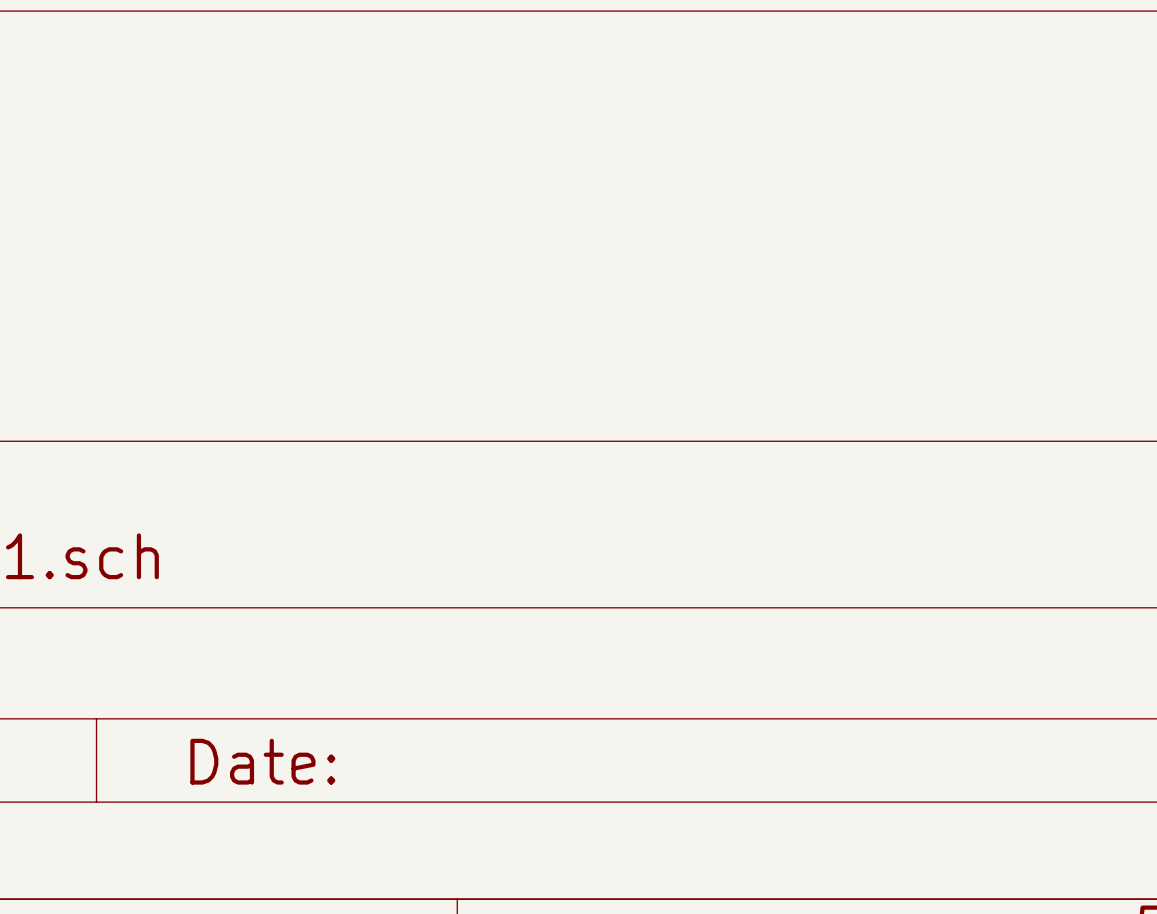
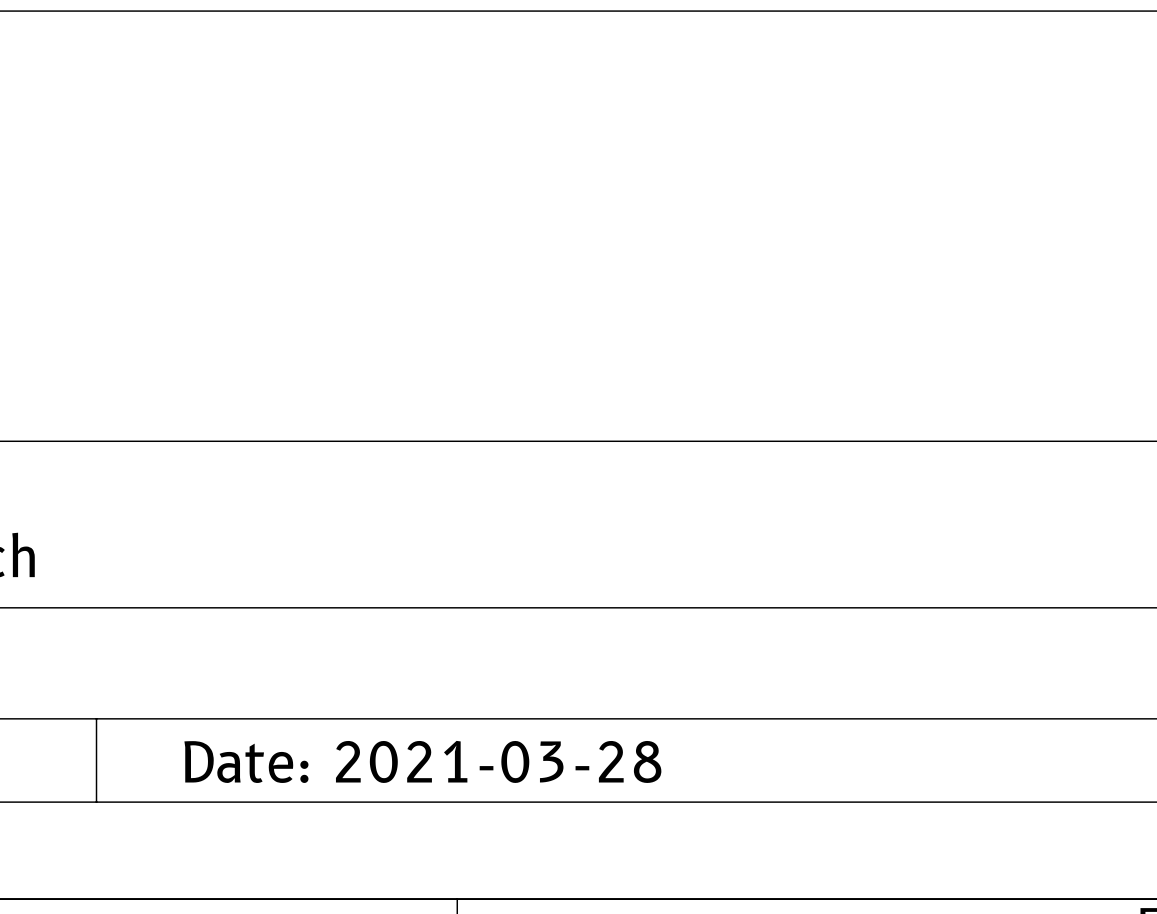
title block: Date: (262, 761) -> Date: 2021-03-28 (422, 761)

